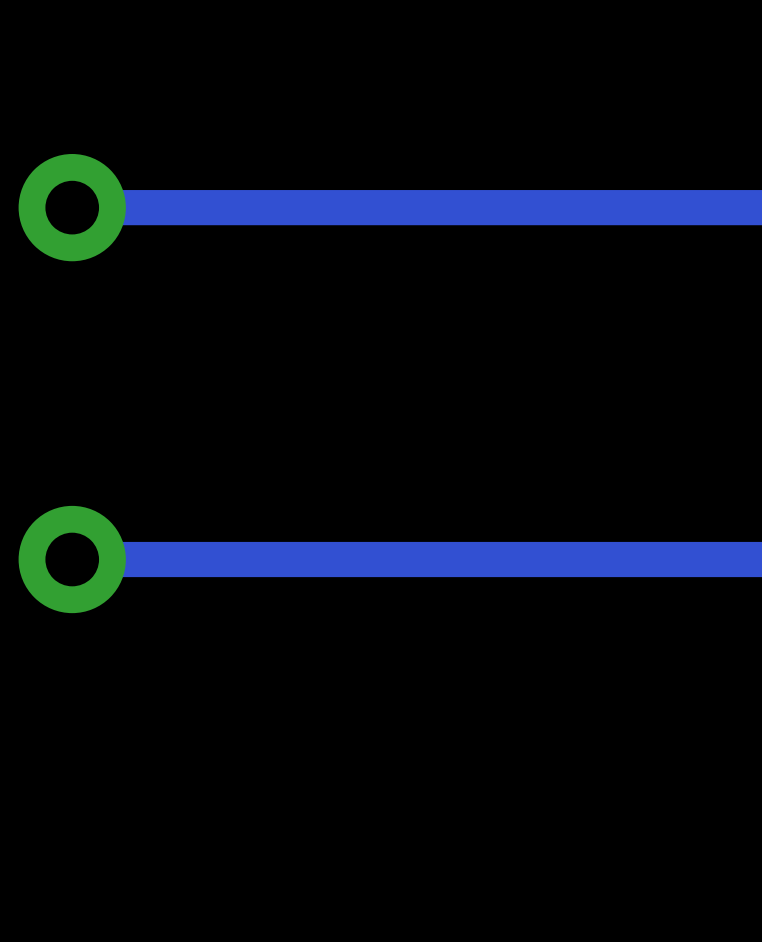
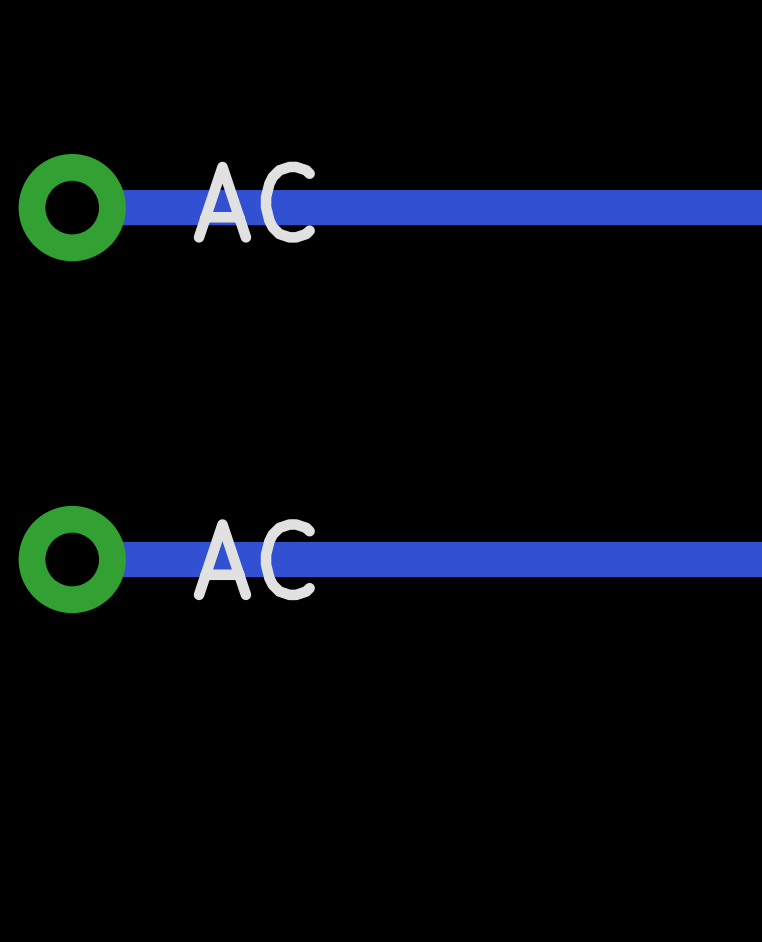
part text: none -> AC (254, 202)
part text: none -> AC (254, 559)

